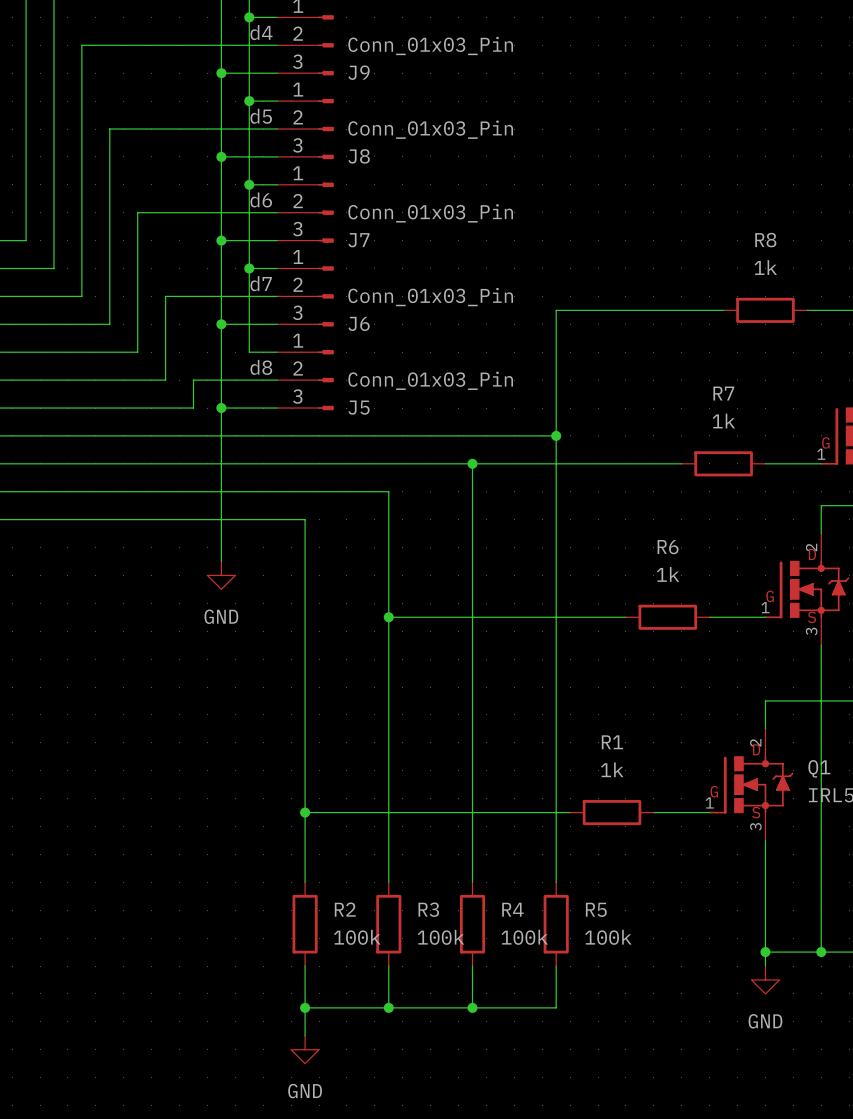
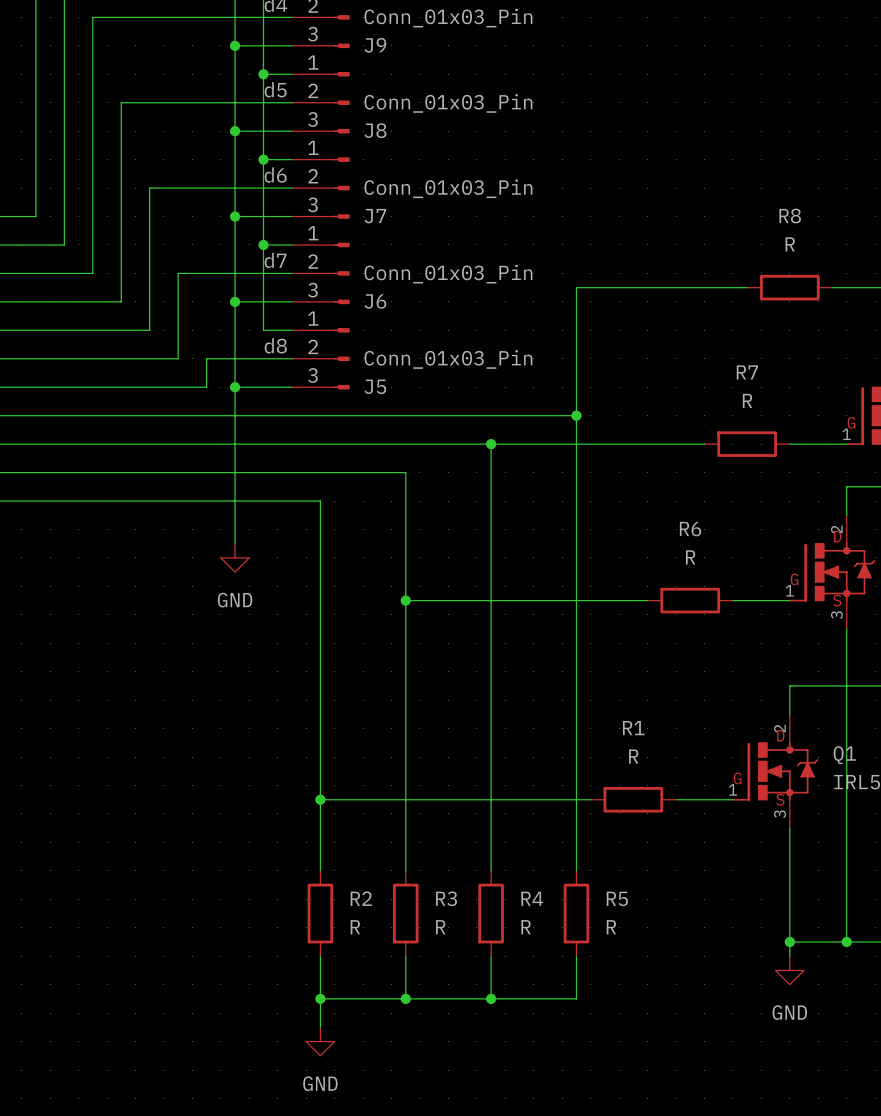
R8 value: 1k (765, 267) -> R (790, 244)
R7 value: 1k (723, 421) -> R (747, 400)
R6 value: 1k (668, 574) -> R (690, 557)
R1 value: 1k (612, 769) -> R (633, 756)
R2 value: 100k (357, 937) -> R (355, 927)
R3 value: 100k (440, 937) -> R (440, 927)
R4 value: 100k (524, 937) -> R (526, 927)
R5 value: 100k (608, 937) -> R (611, 927)

